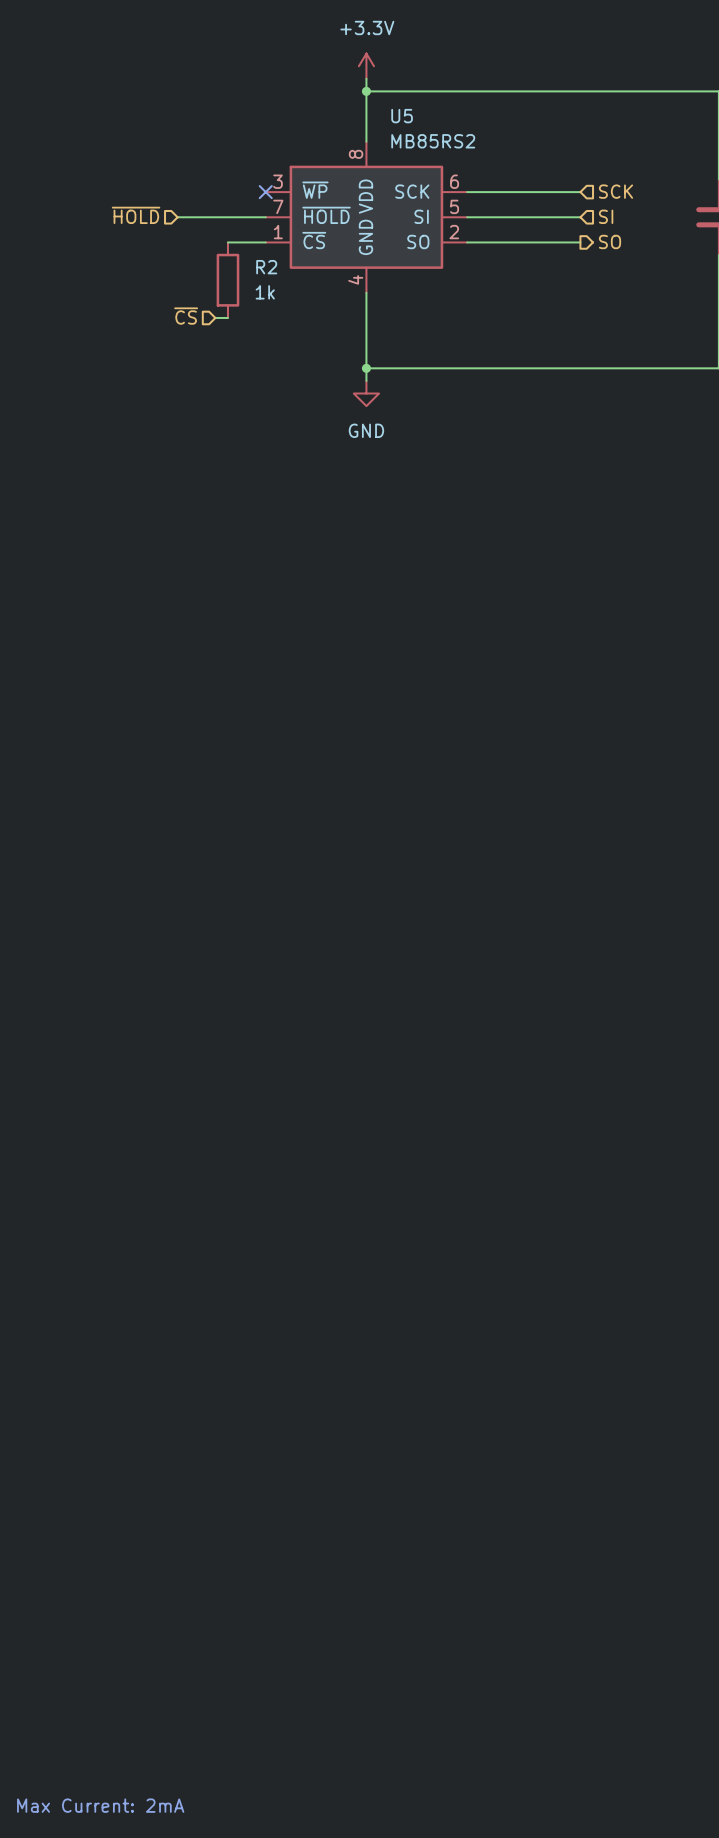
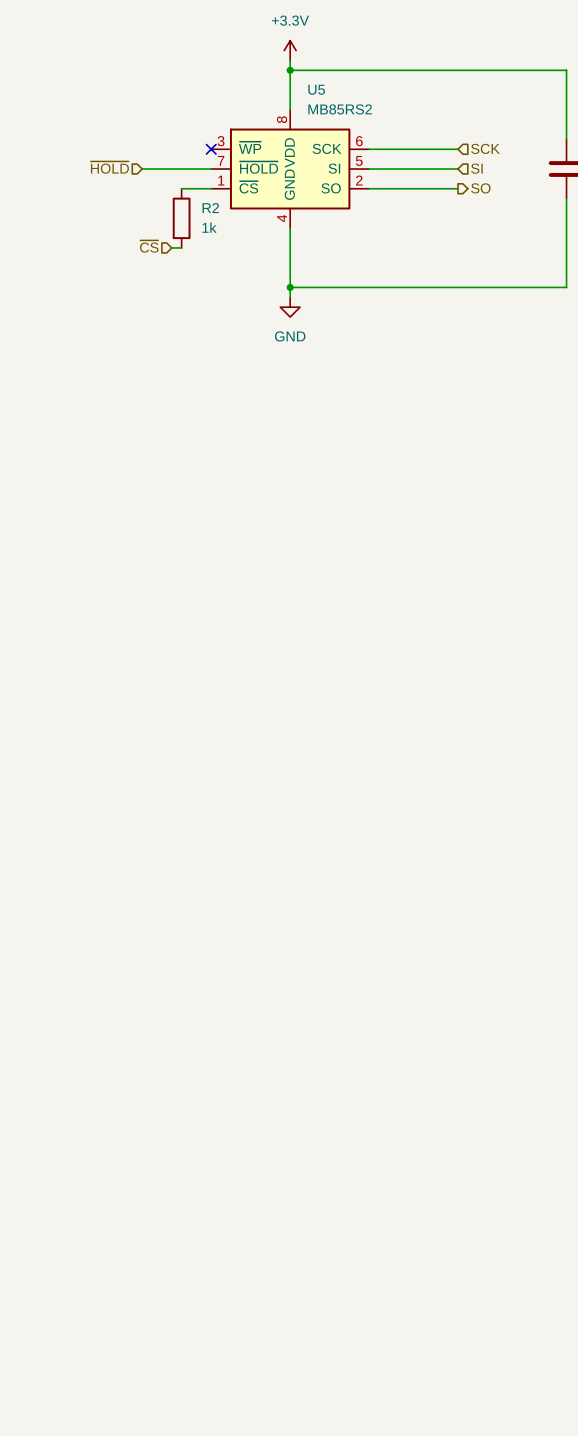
text: Max Current: 2mA (100, 1805) -> none

